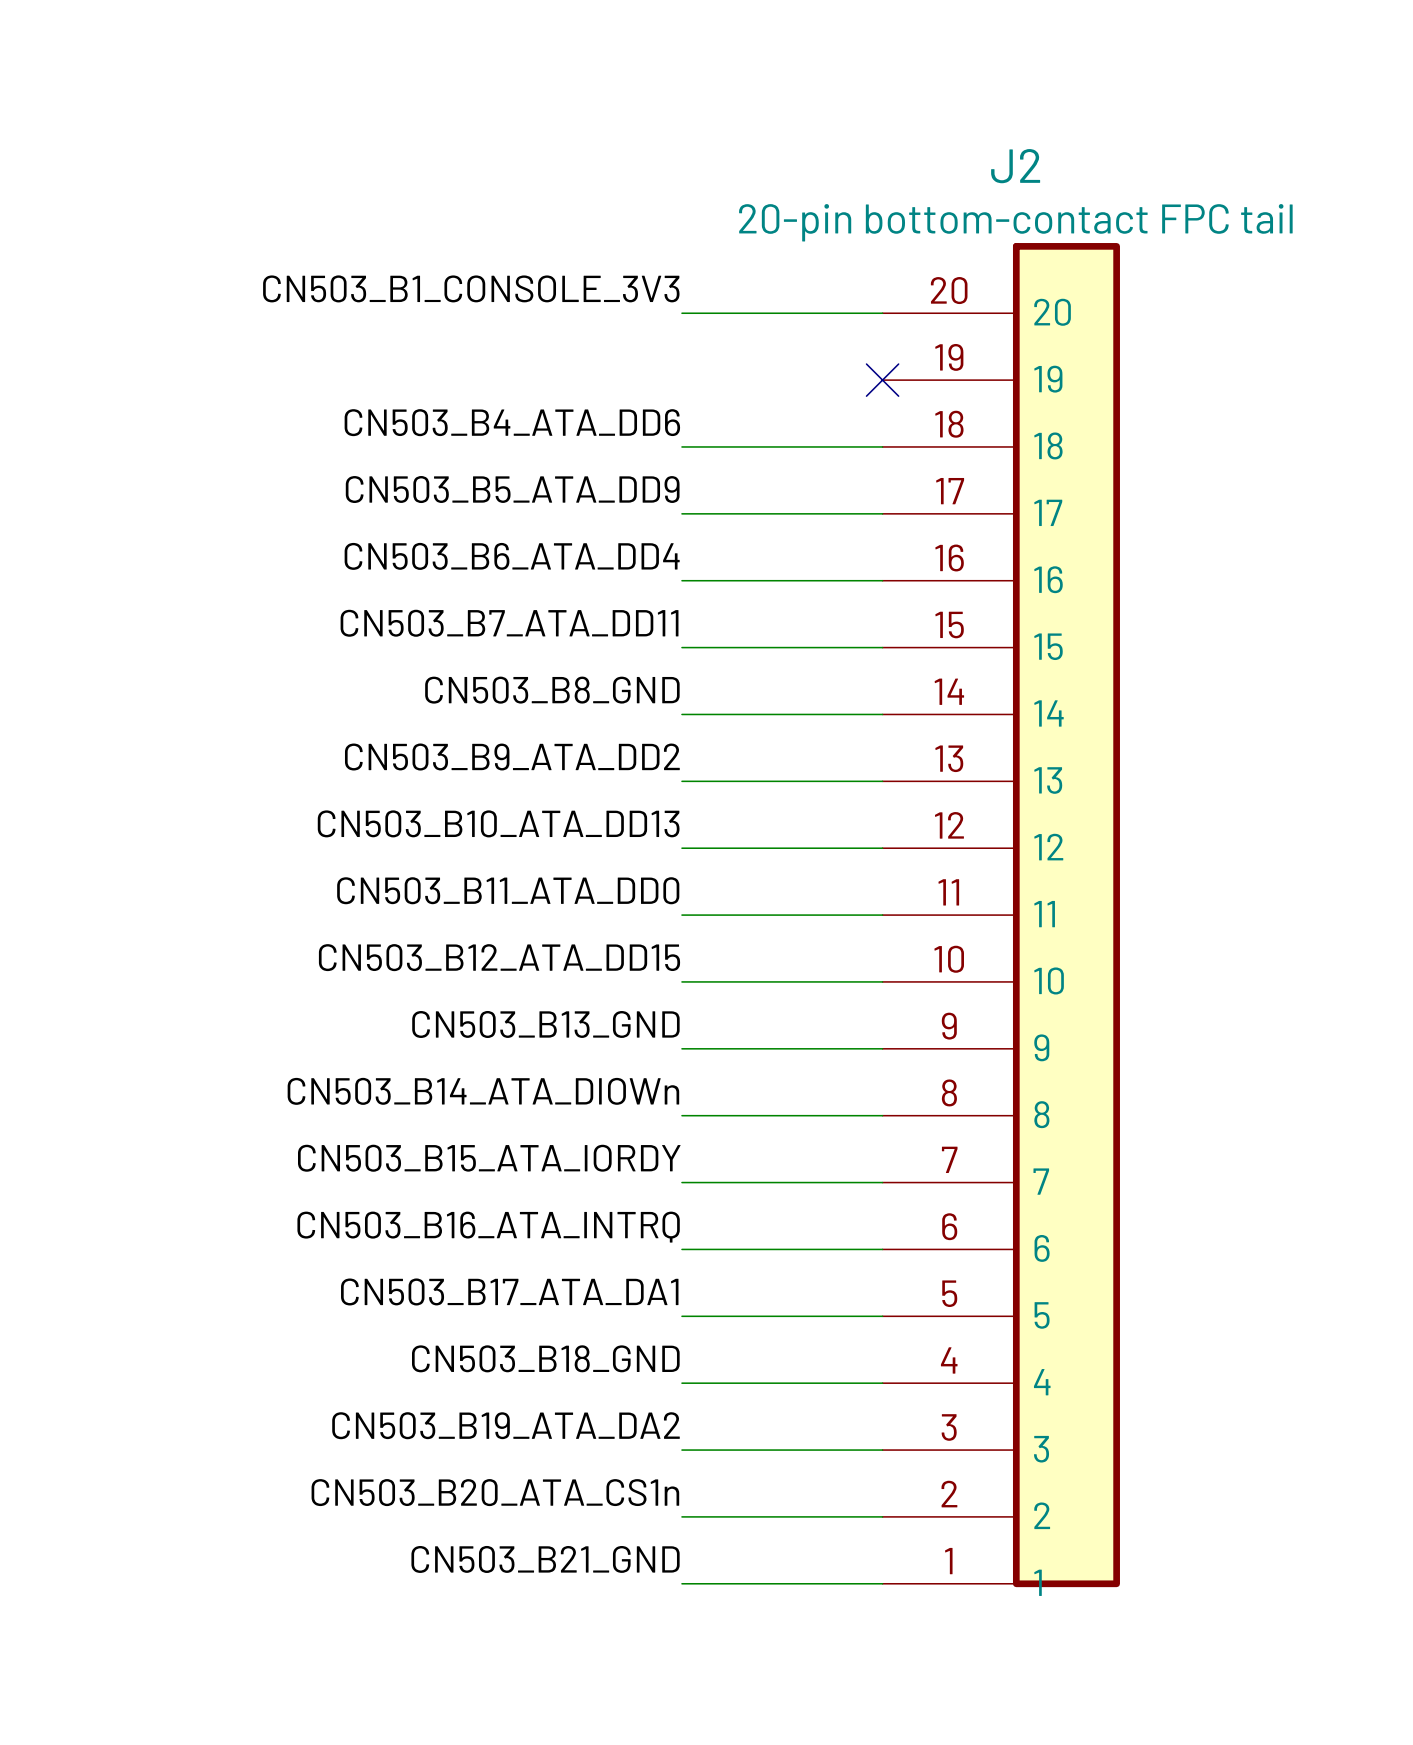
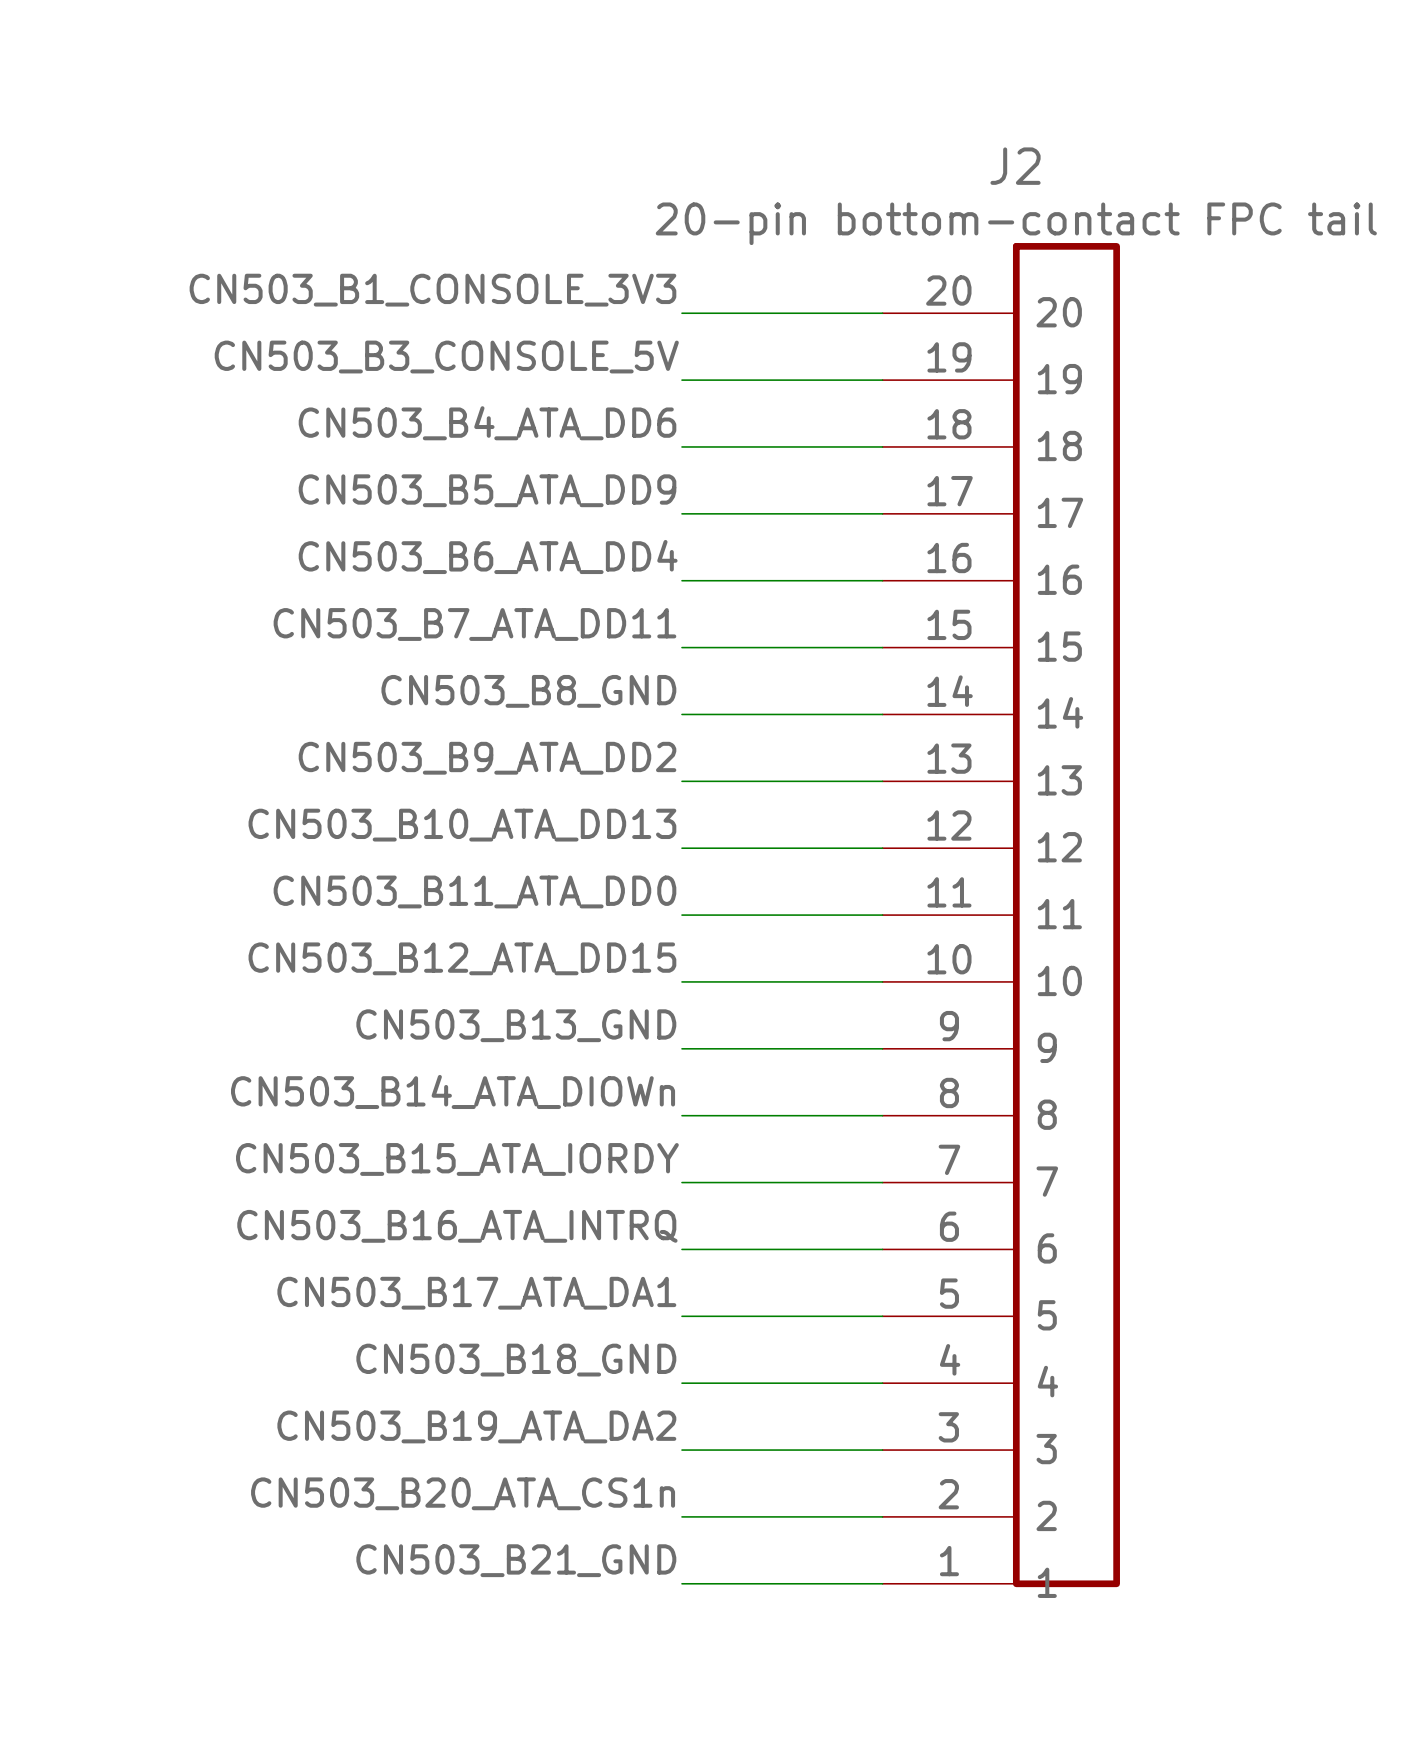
label: none -> CN503_B3_CONSOLE_5V (446, 357)
wire: none -> (681, 380) (882, 380)
no-connect mark: (882, 380) -> none

